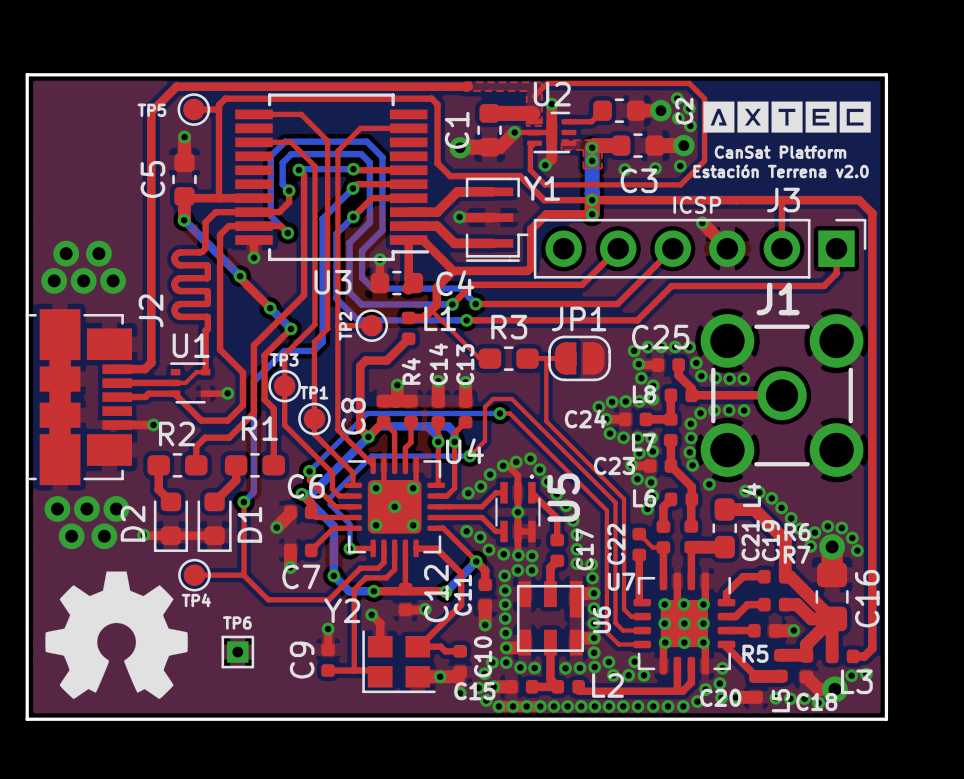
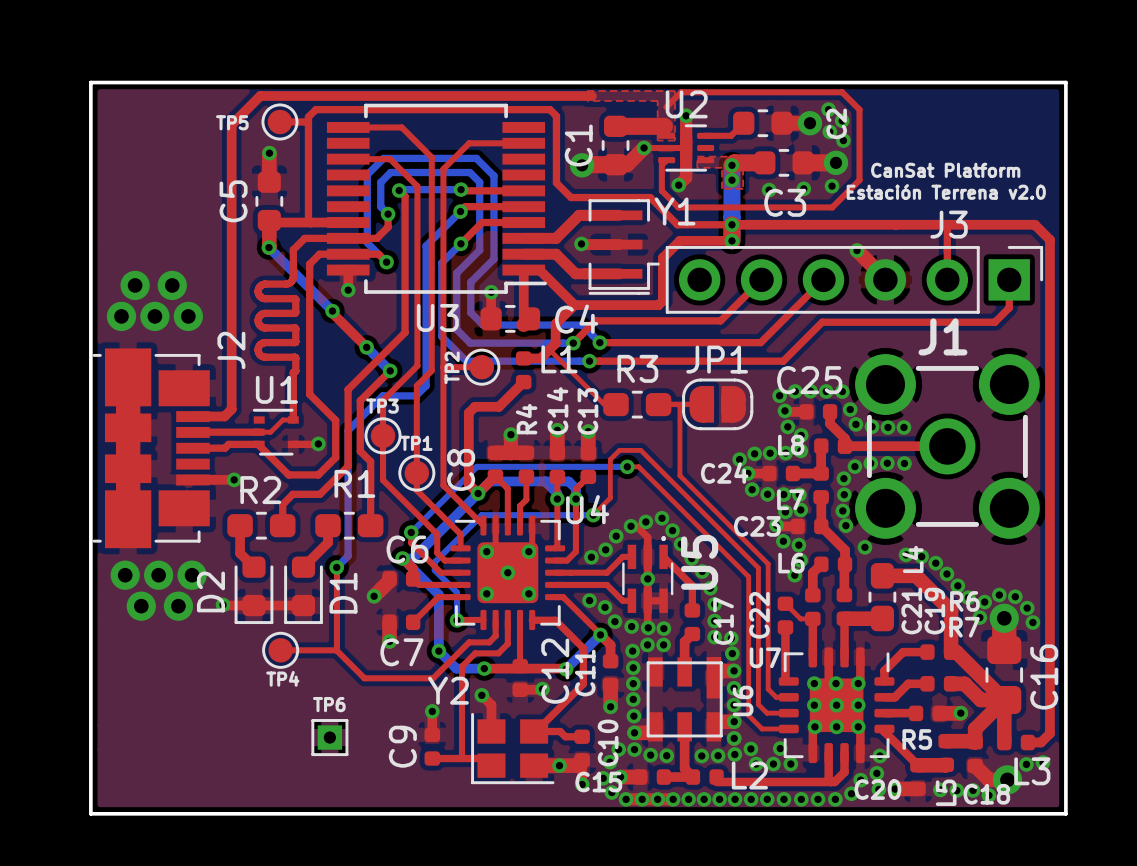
drawing: [703, 101, 871, 133] -> none
text: ICSP (697, 205) -> none
drawing: [45, 571, 188, 699] -> none

